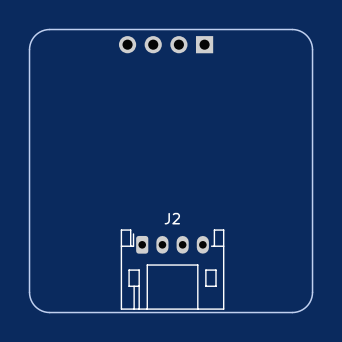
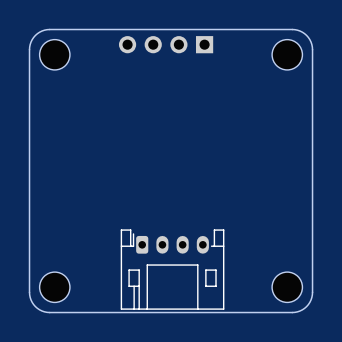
part: none -> (54, 54)
part: none -> (287, 54)
J2 name: J2 (172, 218) -> none
part: none -> (54, 287)
part: none -> (287, 287)

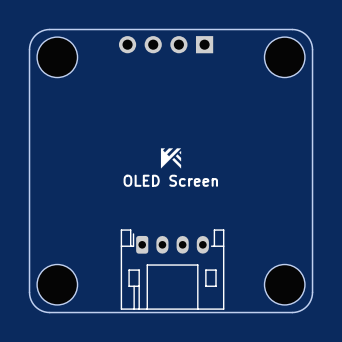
part footprint: [39, 39, 70, 70] -> [37, 37, 78, 78]
part footprint: [272, 39, 303, 70] -> [264, 37, 305, 78]
drawing: none -> [160, 148, 182, 169]
text: none -> OLED Screen (170, 180)
part footprint: [39, 272, 70, 303] -> [37, 264, 78, 305]
part footprint: [272, 272, 303, 303] -> [264, 264, 305, 305]

